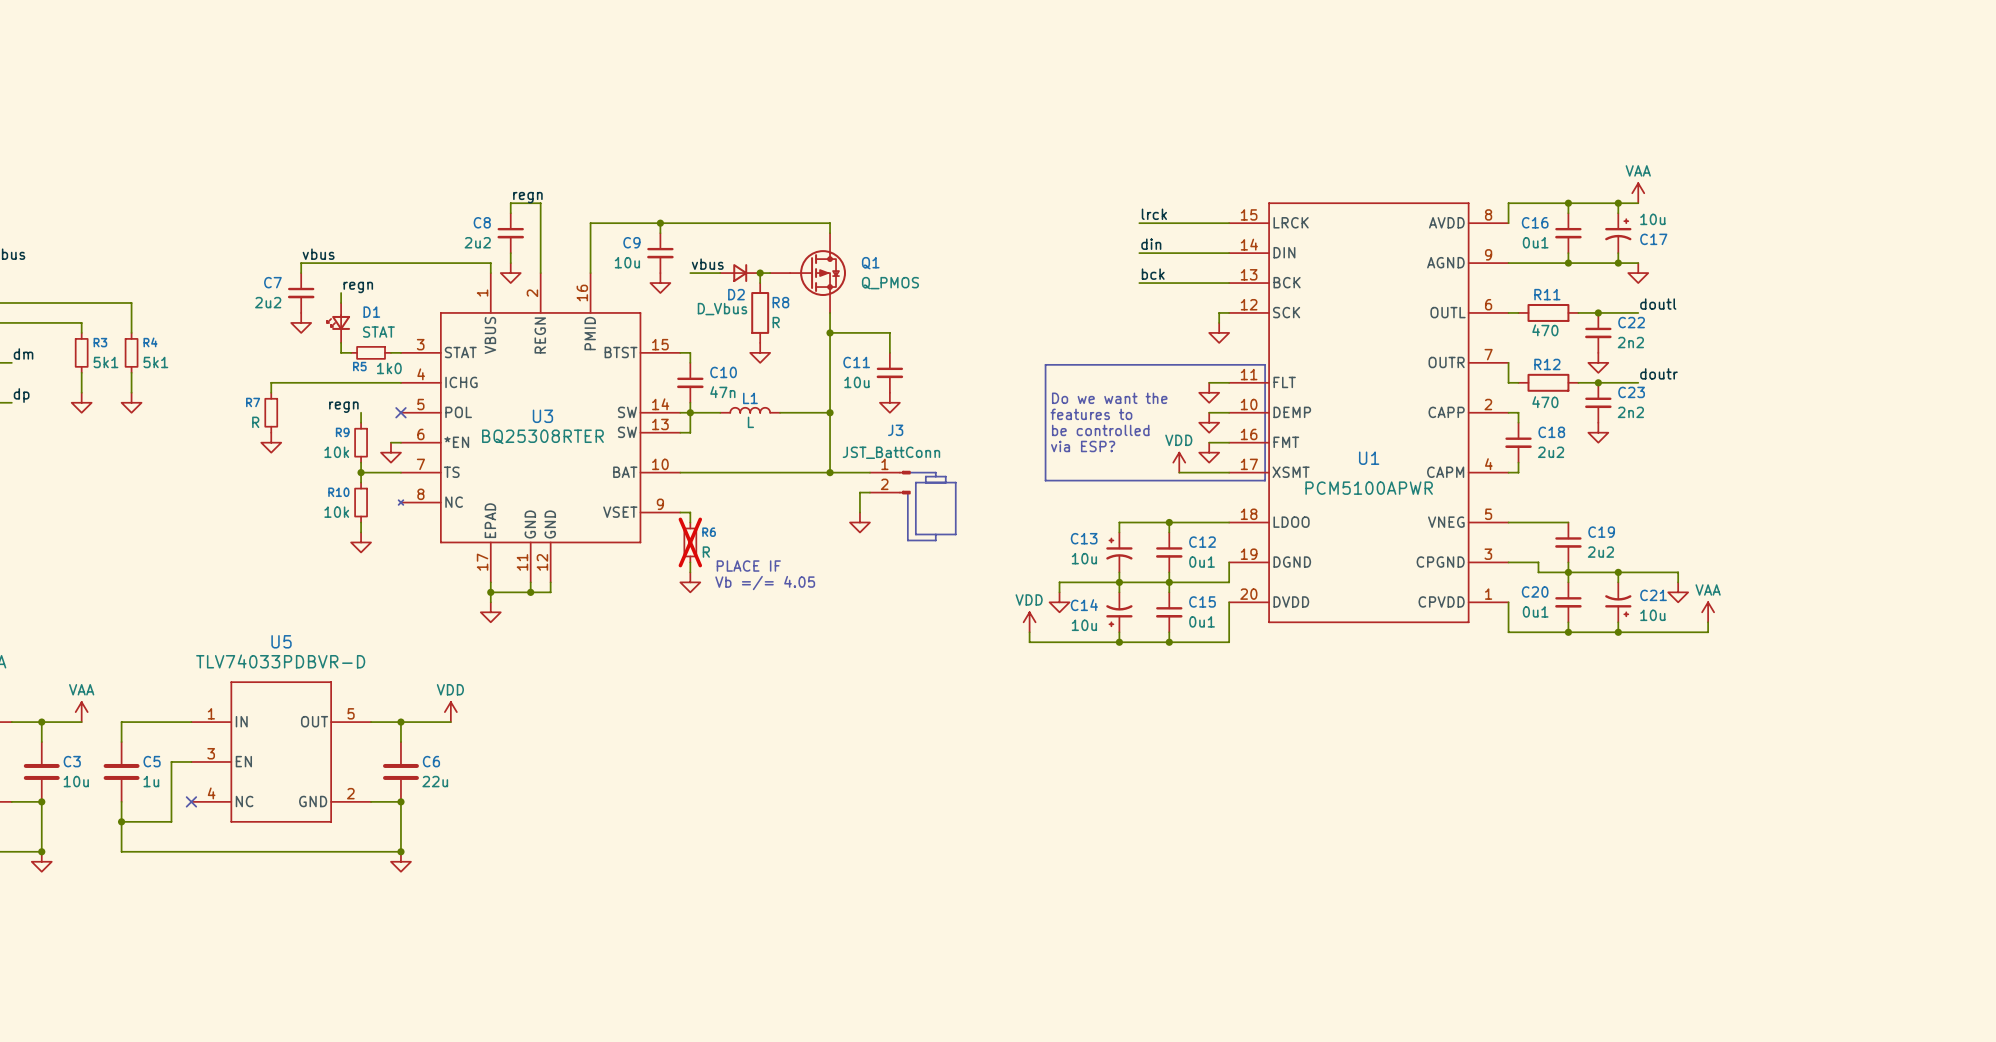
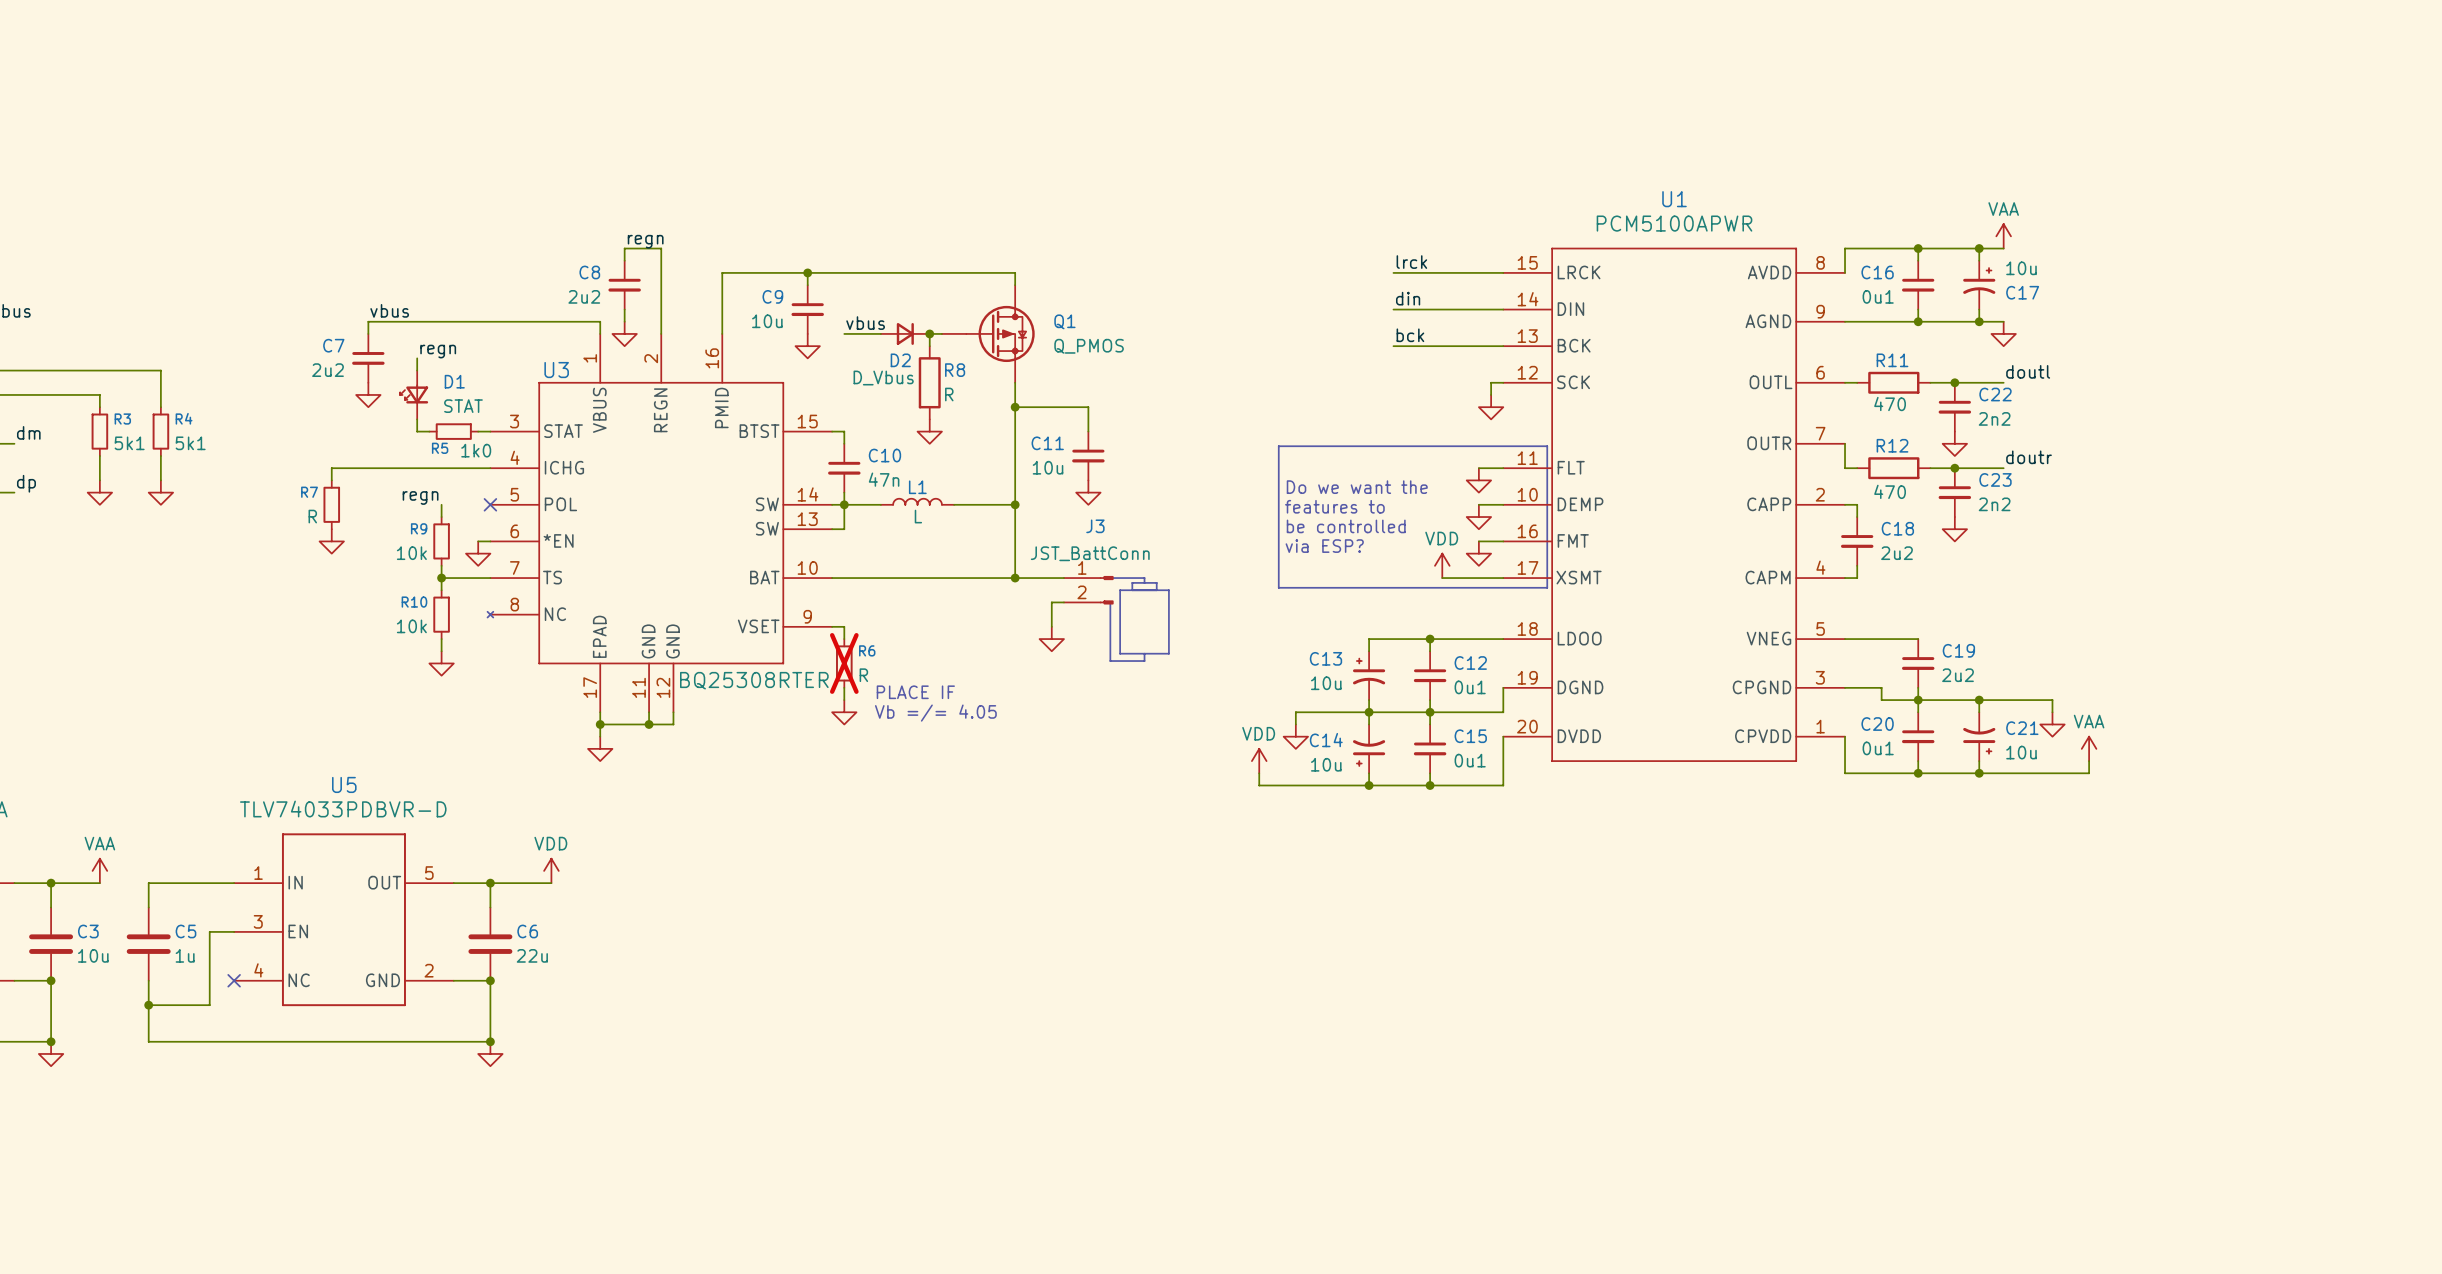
U3 name position: U3 (542, 416) -> U3 (556, 370)
U3 value position: BQ25308RTER (542, 436) -> BQ25308RTER (754, 680)
U1 name position: U1 (1369, 458) -> U1 (1674, 199)
U1 value position: PCM5100APWR (1369, 488) -> PCM5100APWR (1674, 223)

